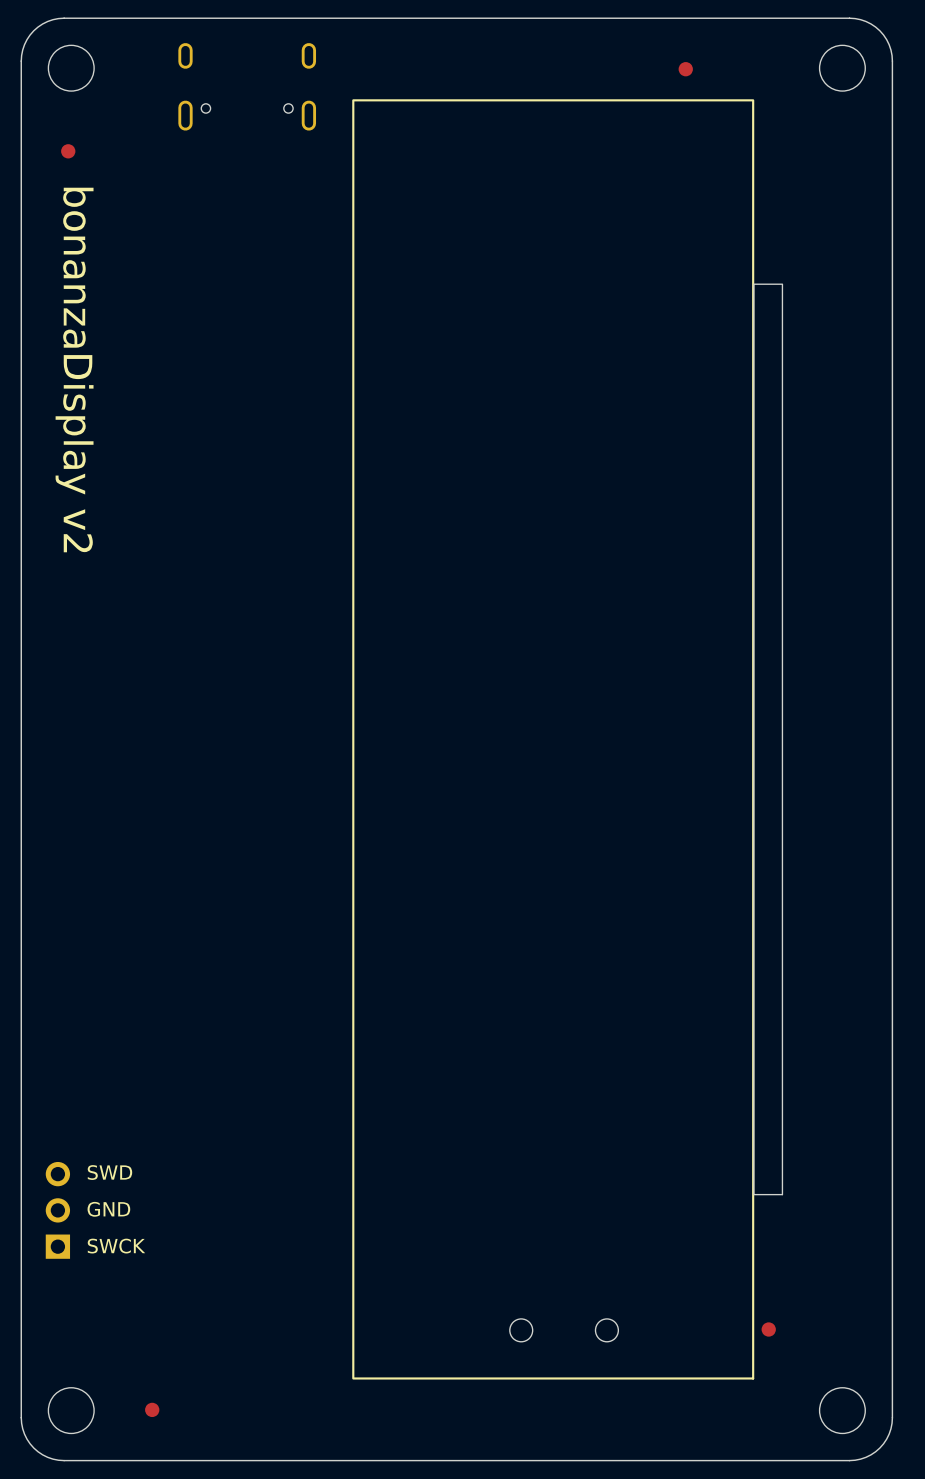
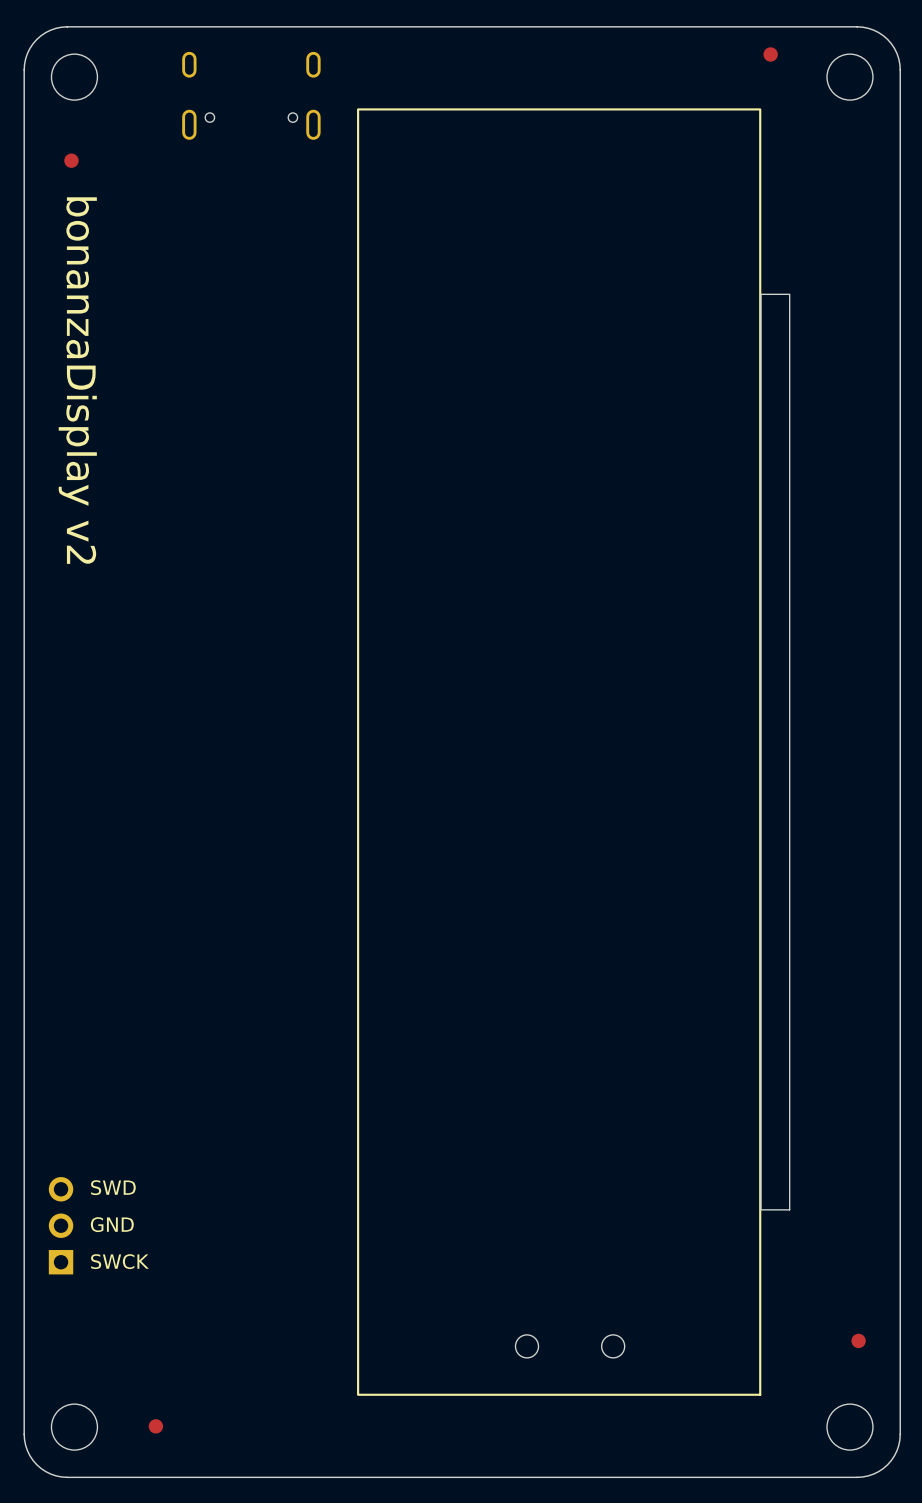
part position: (685, 69) -> (770, 54)
part position: (768, 1329) -> (858, 1340)

